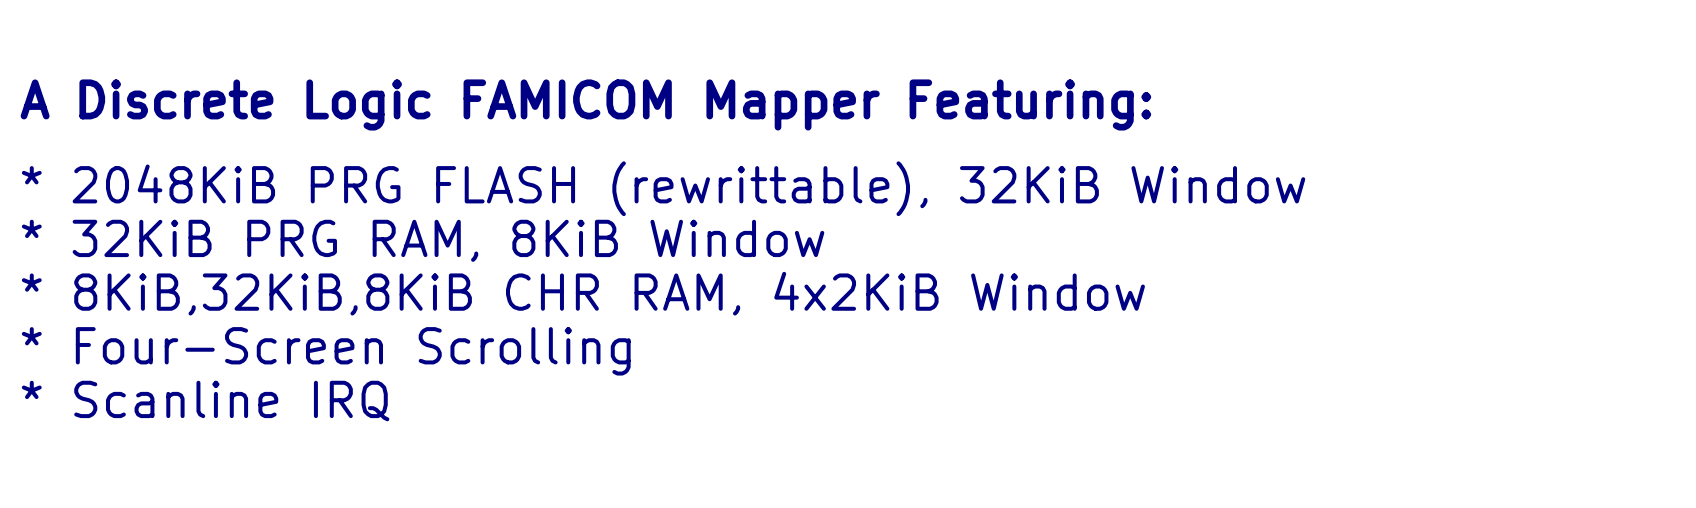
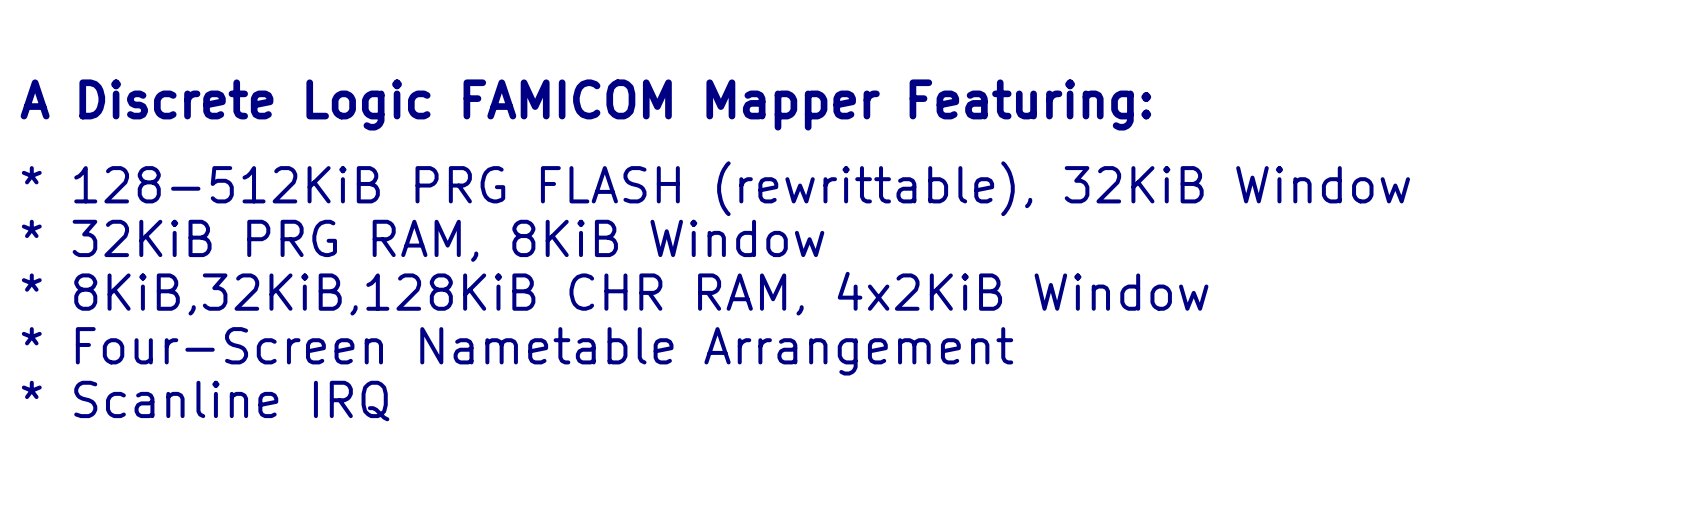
text: * 2048KiB PRG FLASH (rewrittable), 32KiB Window (663, 188) -> * 128-512KiB PRG FLASH (rewrittable), 32KiB Window (715, 188)
text: * 8KiB,32KiB,8KiB CHR RAM, 4x2KiB Window (583, 293) -> * 8KiB,32KiB,128KiB CHR RAM, 4x2KiB Window (615, 293)
text: * Four-Screen Scrolling (326, 351) -> * Four-Screen Nametable Arrangement (517, 351)

